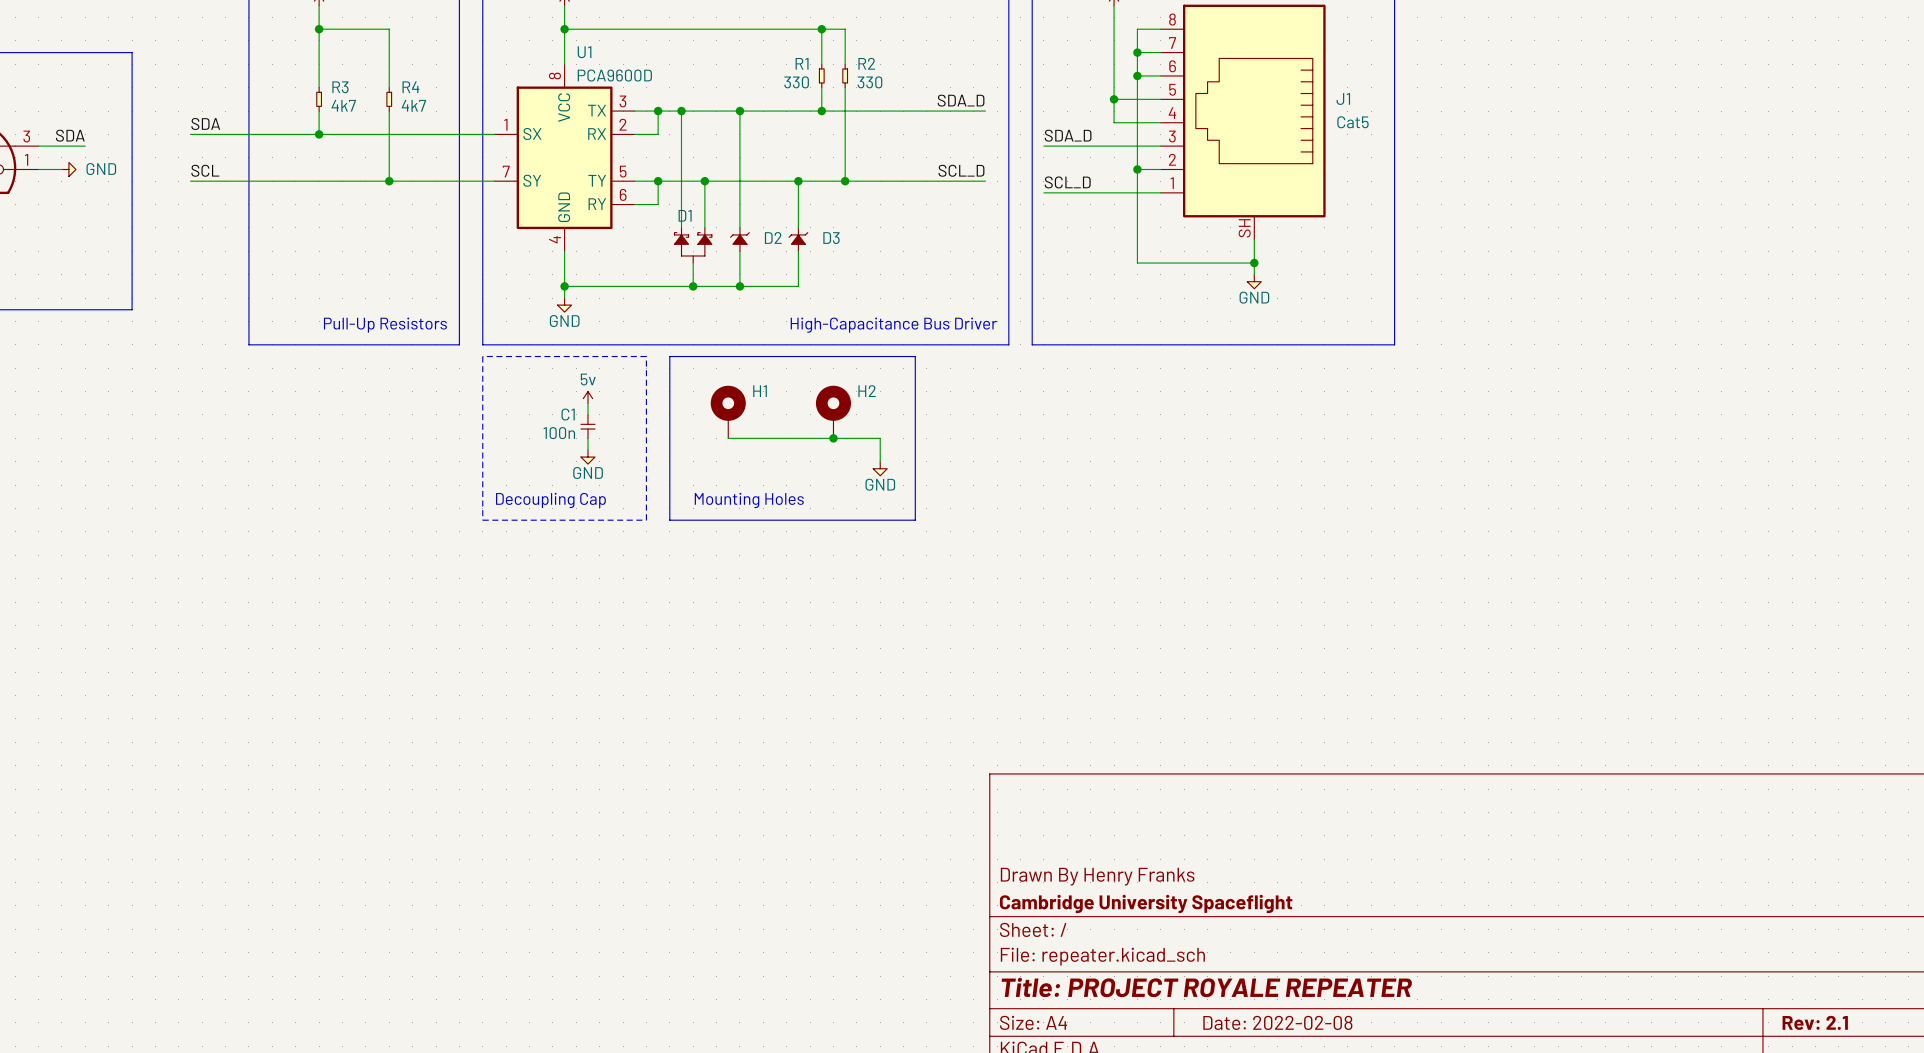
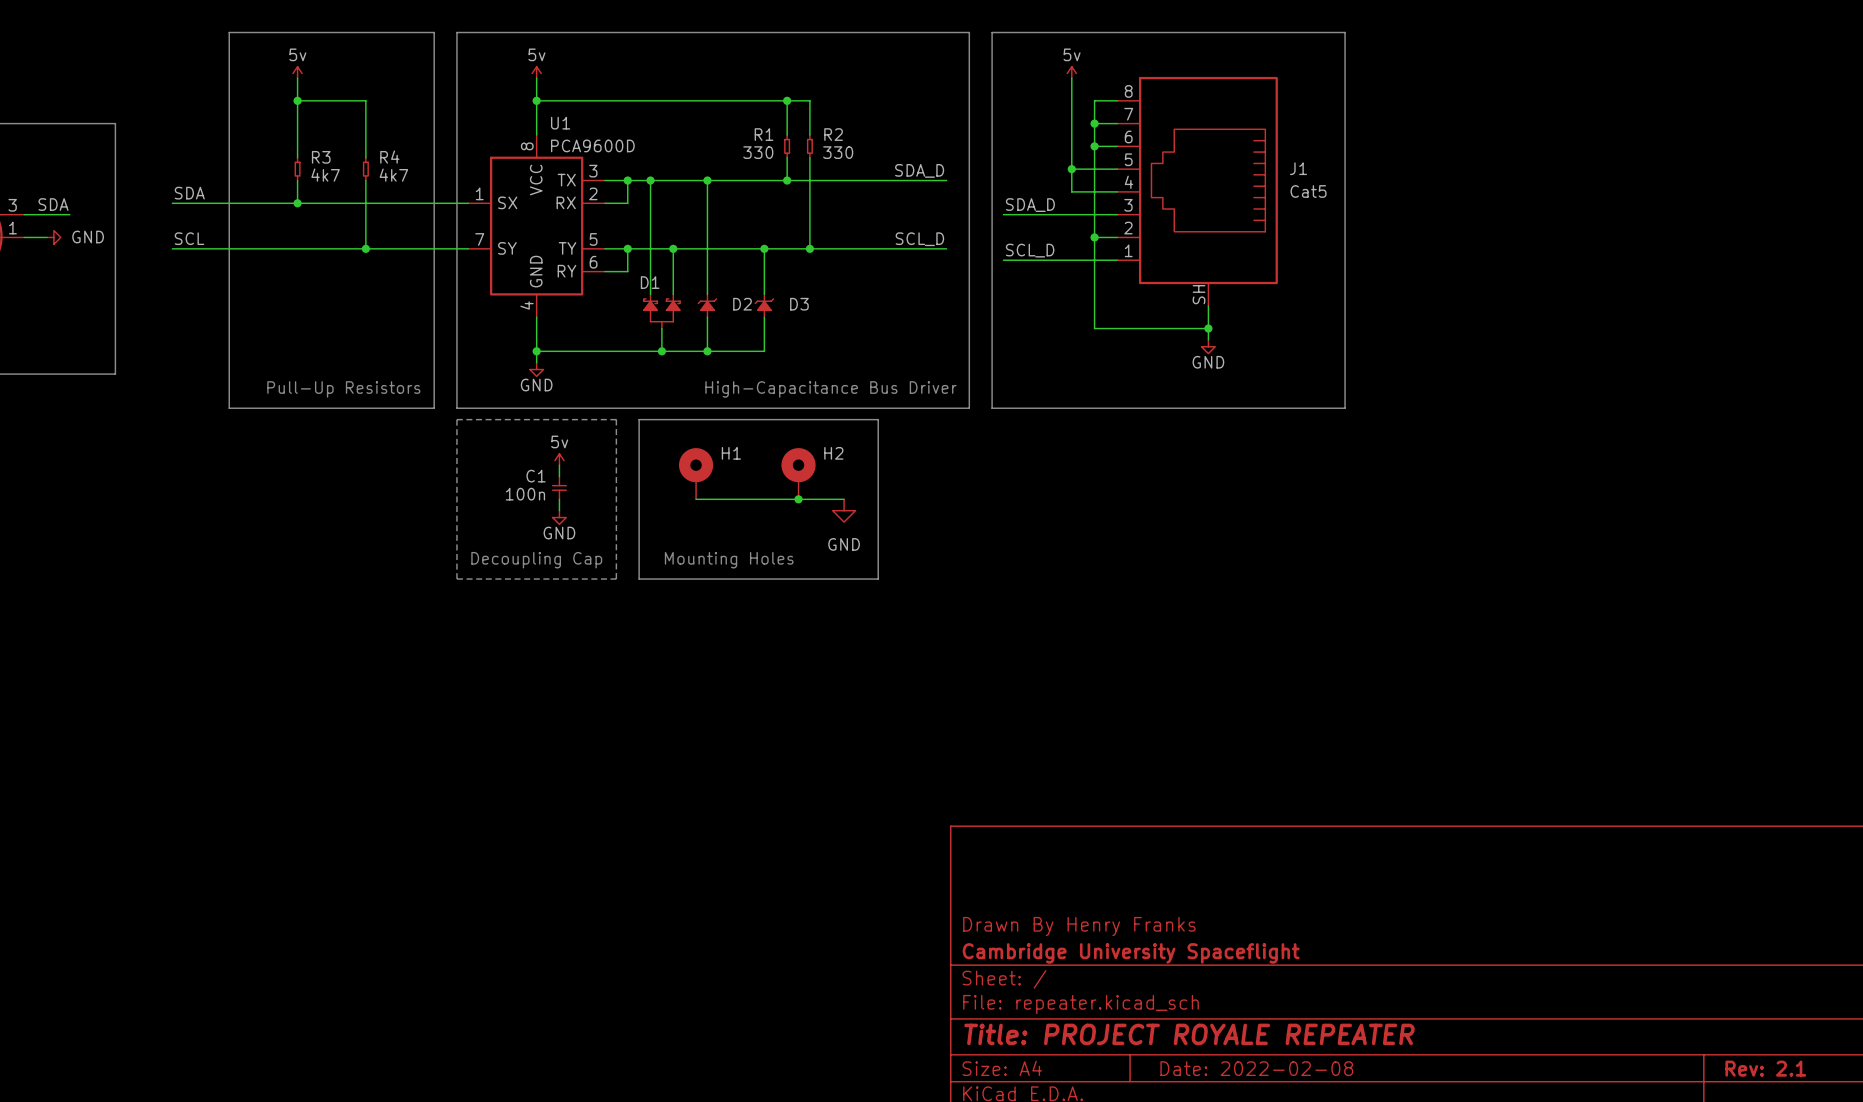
power symbol: none -> GND (844, 510)
power symbol: GND (880, 468) -> none

